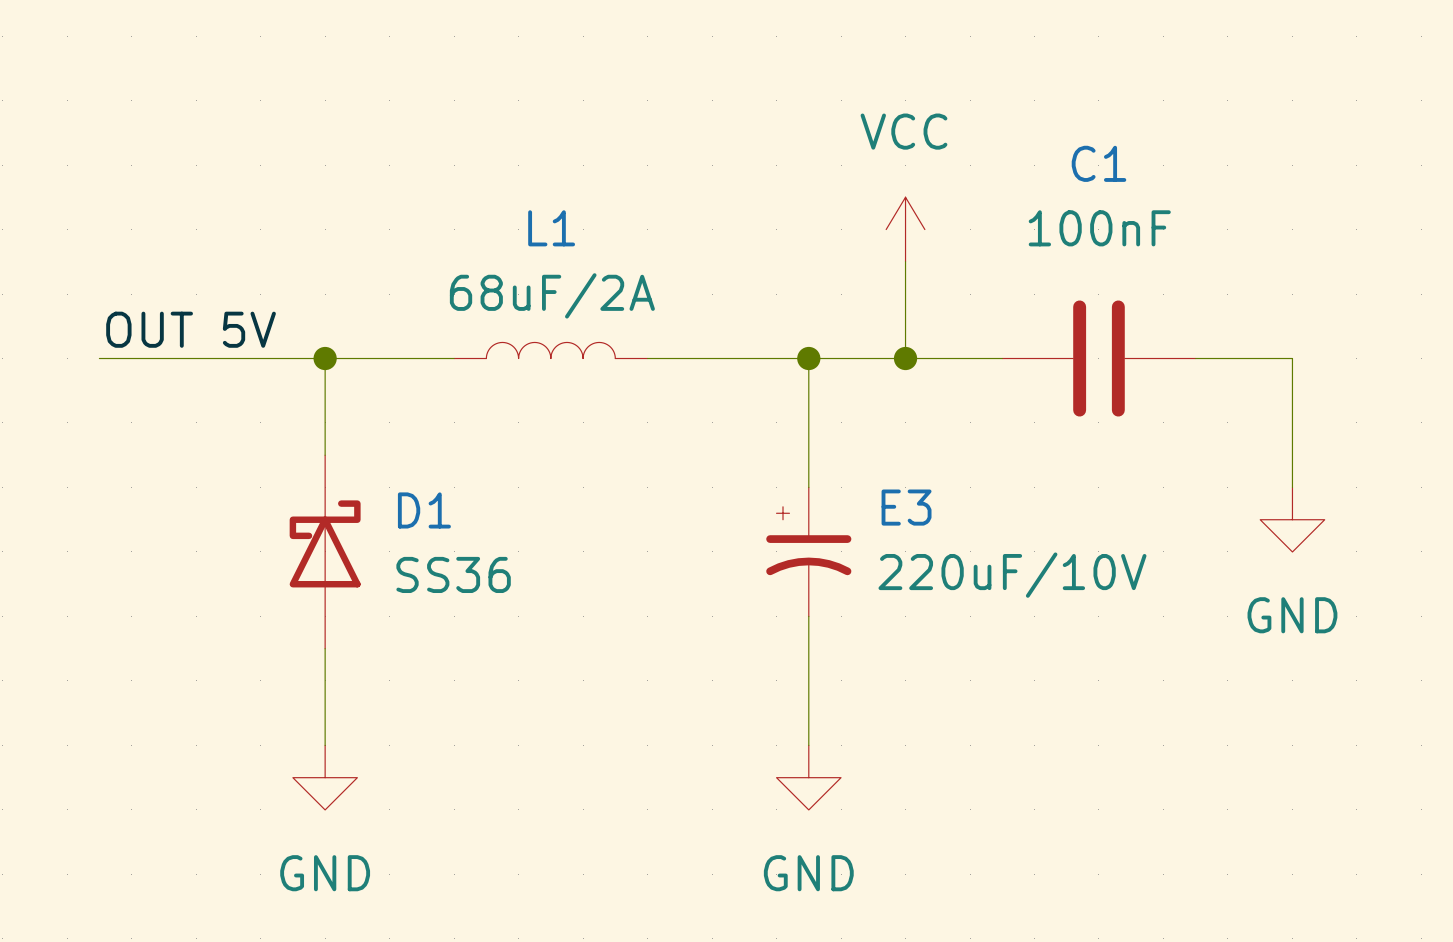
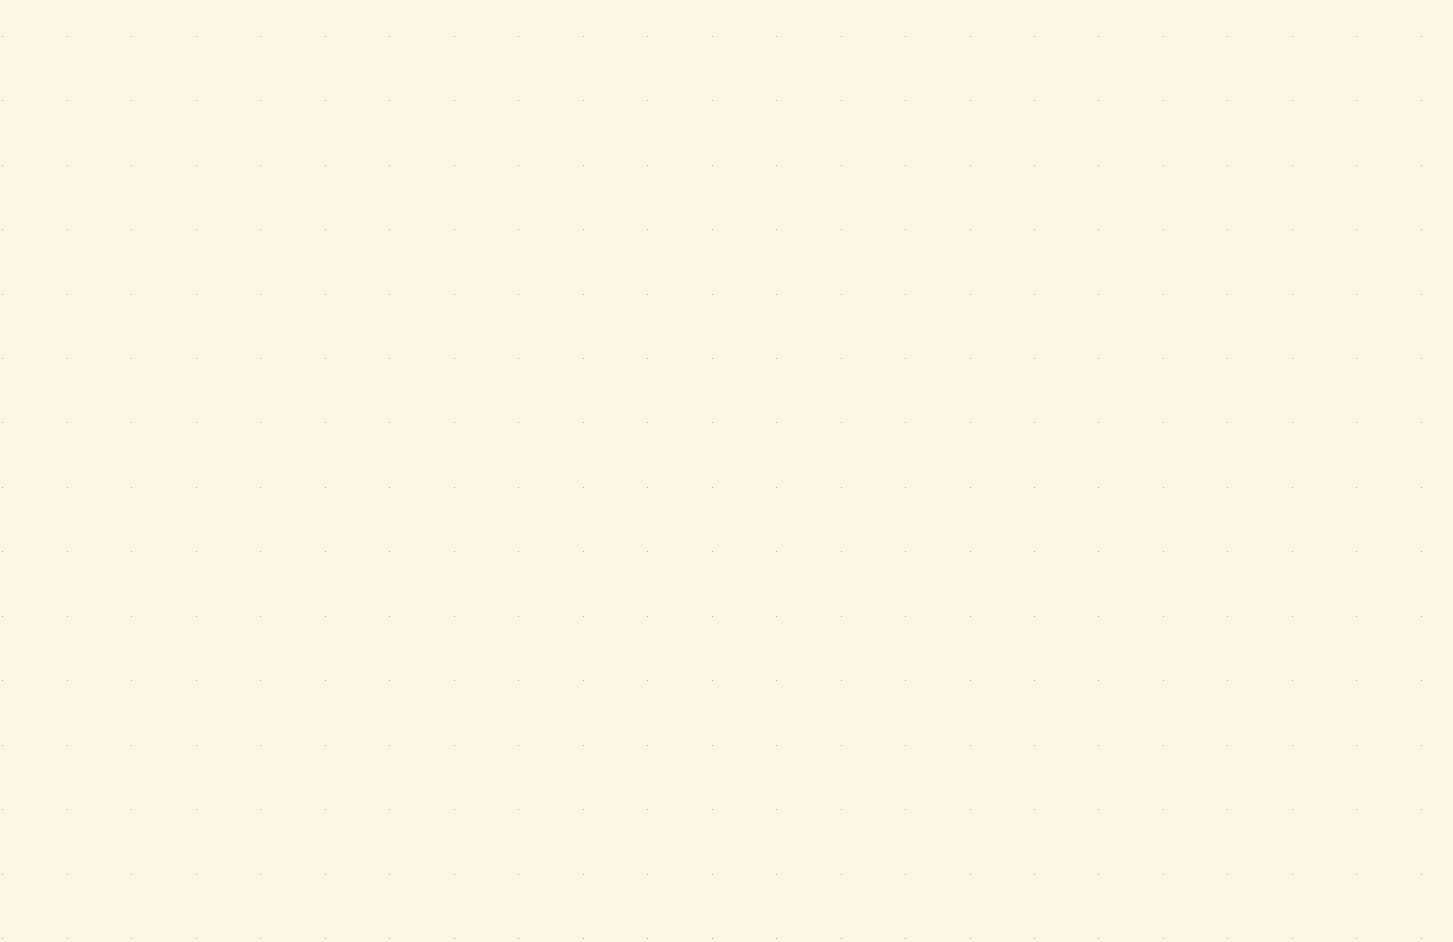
power symbol: VCC (905, 229) -> none
wire: (905, 261) (905, 358) -> none
label: OUT 5V (191, 329) -> none
L1: 68uF/2A (550, 350) -> none
wire: (99, 358) (454, 358) -> none
wire: (325, 358) (325, 455) -> none
junction: (325, 358) -> none
wire: (647, 358) (1002, 358) -> none
wire: (808, 358) (808, 487) -> none
junction: (808, 358) -> none
junction: (905, 358) -> none
C1: 100nF (1098, 358) -> none
wire: (1195, 358) (1292, 358) (1292, 487) -> none
power symbol: GND (1292, 519) -> none
D1: SS36 (325, 551) -> none
E3: 220uF/10V (808, 551) -> none
wire: (808, 616) (808, 745) -> none
wire: (325, 648) (325, 745) -> none
power symbol: GND (325, 777) -> none
power symbol: GND (808, 777) -> none

